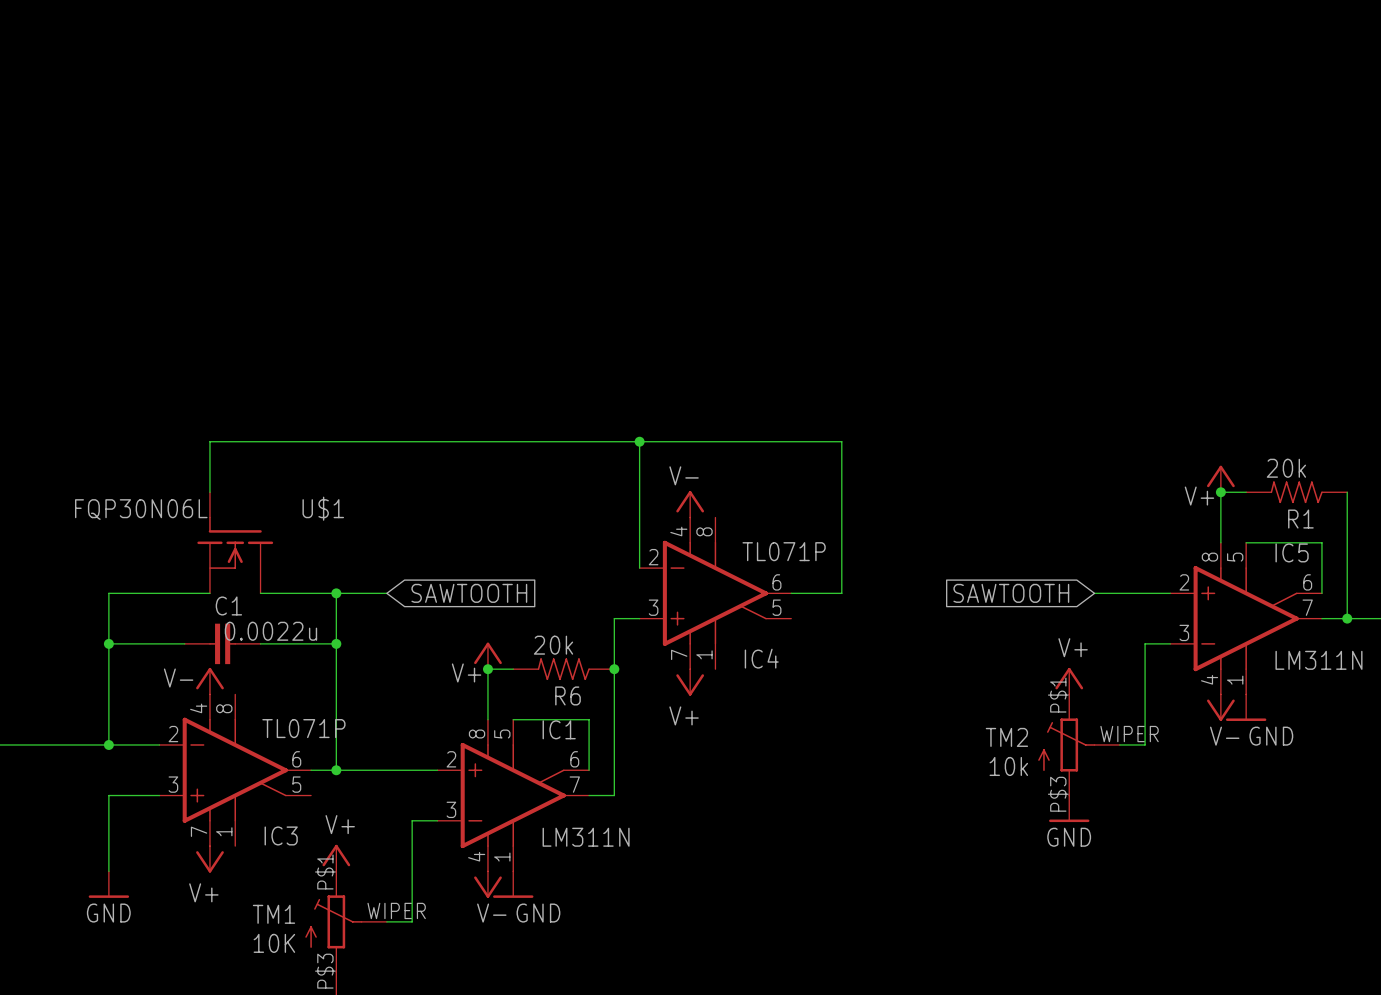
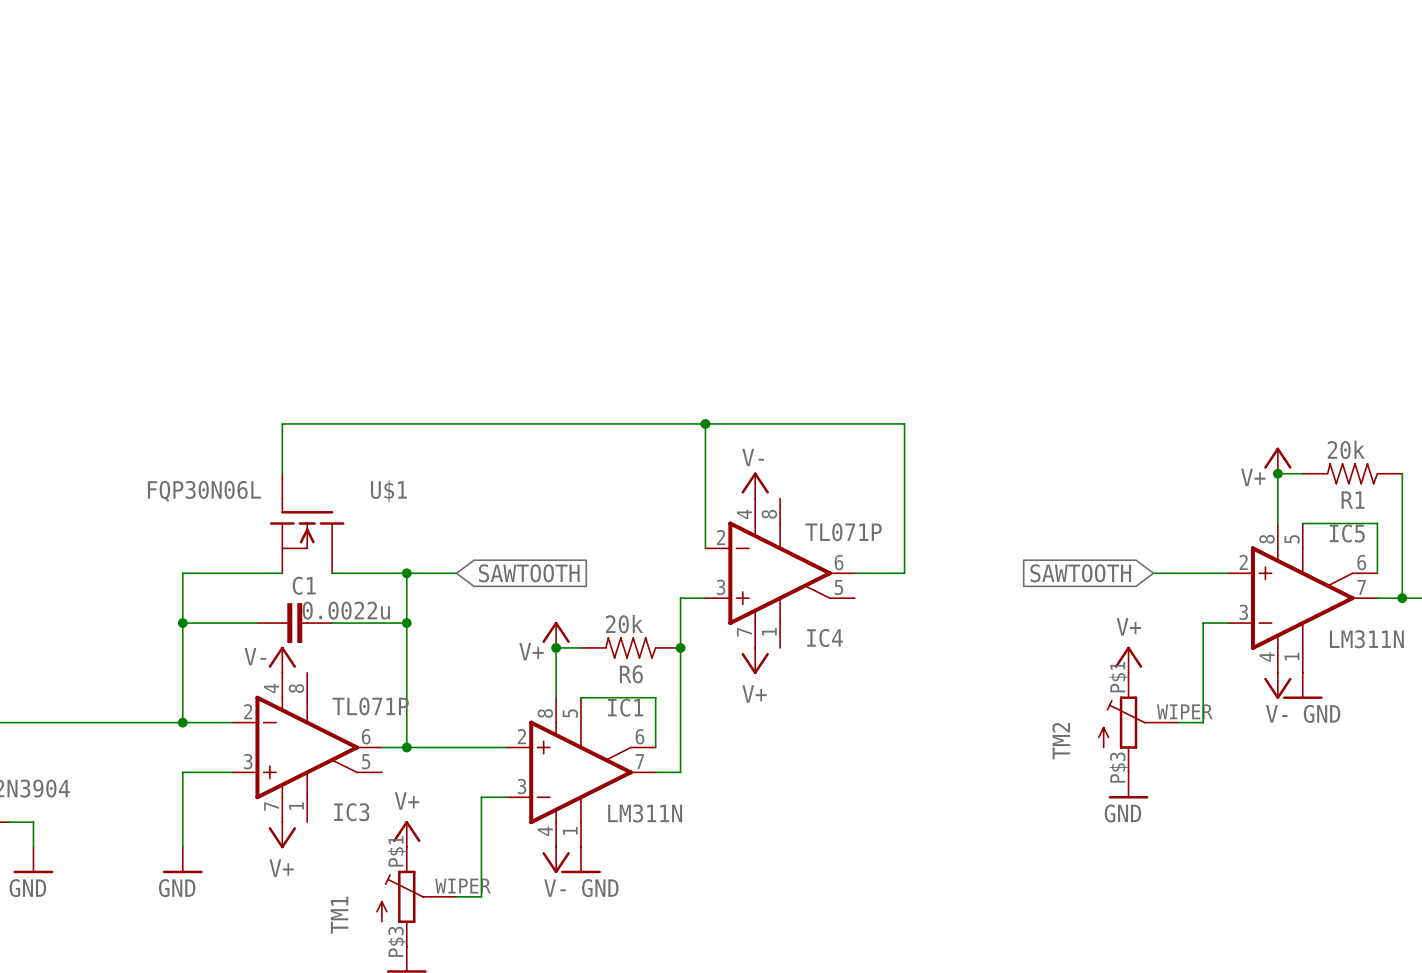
TM2 name rotation: 0° (1006, 737) -> 90° counterclockwise (1061, 741)
TM2 value: 10k (1008, 766) -> none
TM1 name rotation: 0° (274, 914) -> 90° counterclockwise (339, 915)
TM1 value: 10K (274, 943) -> none

